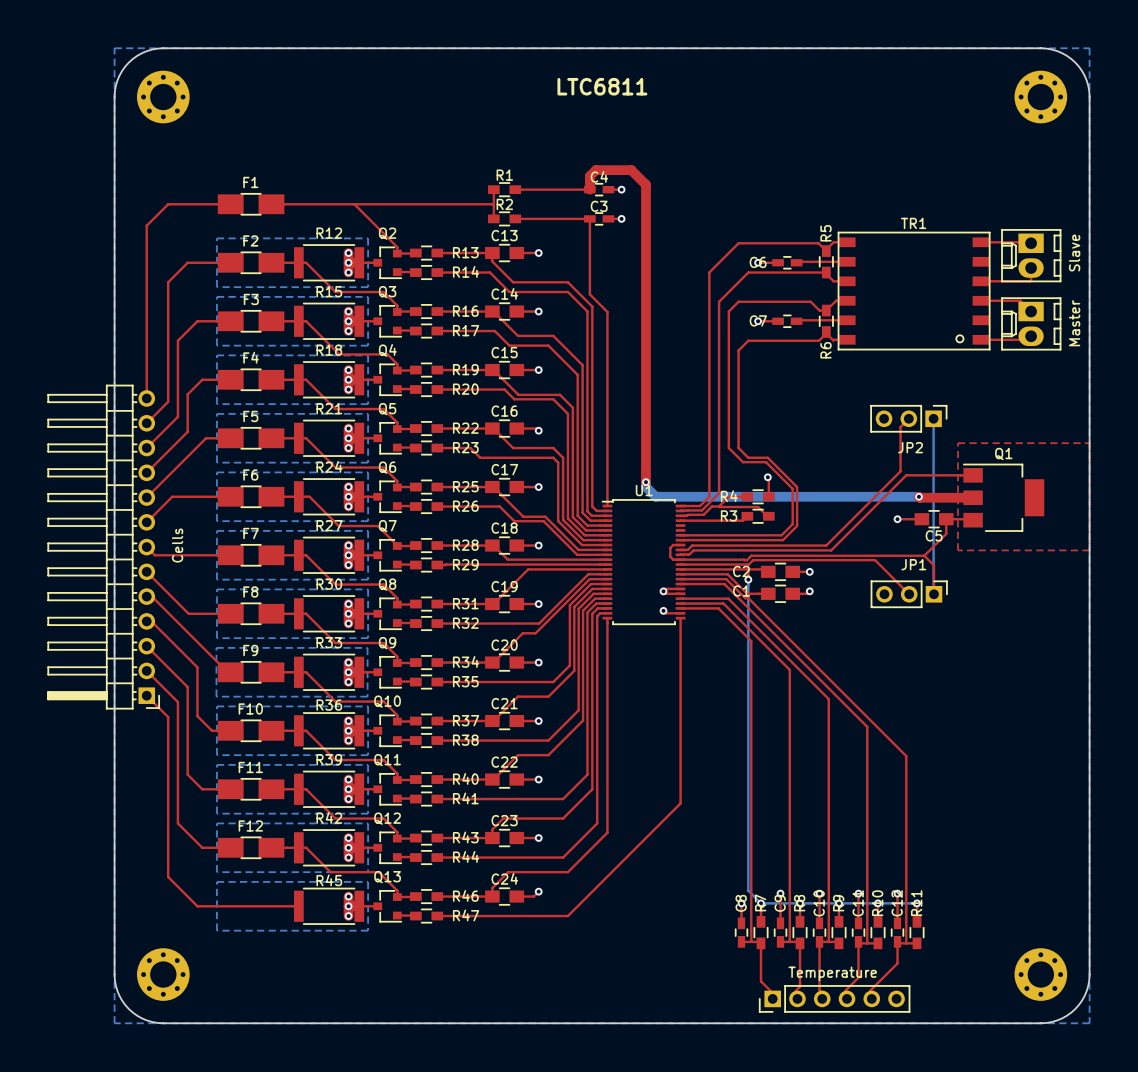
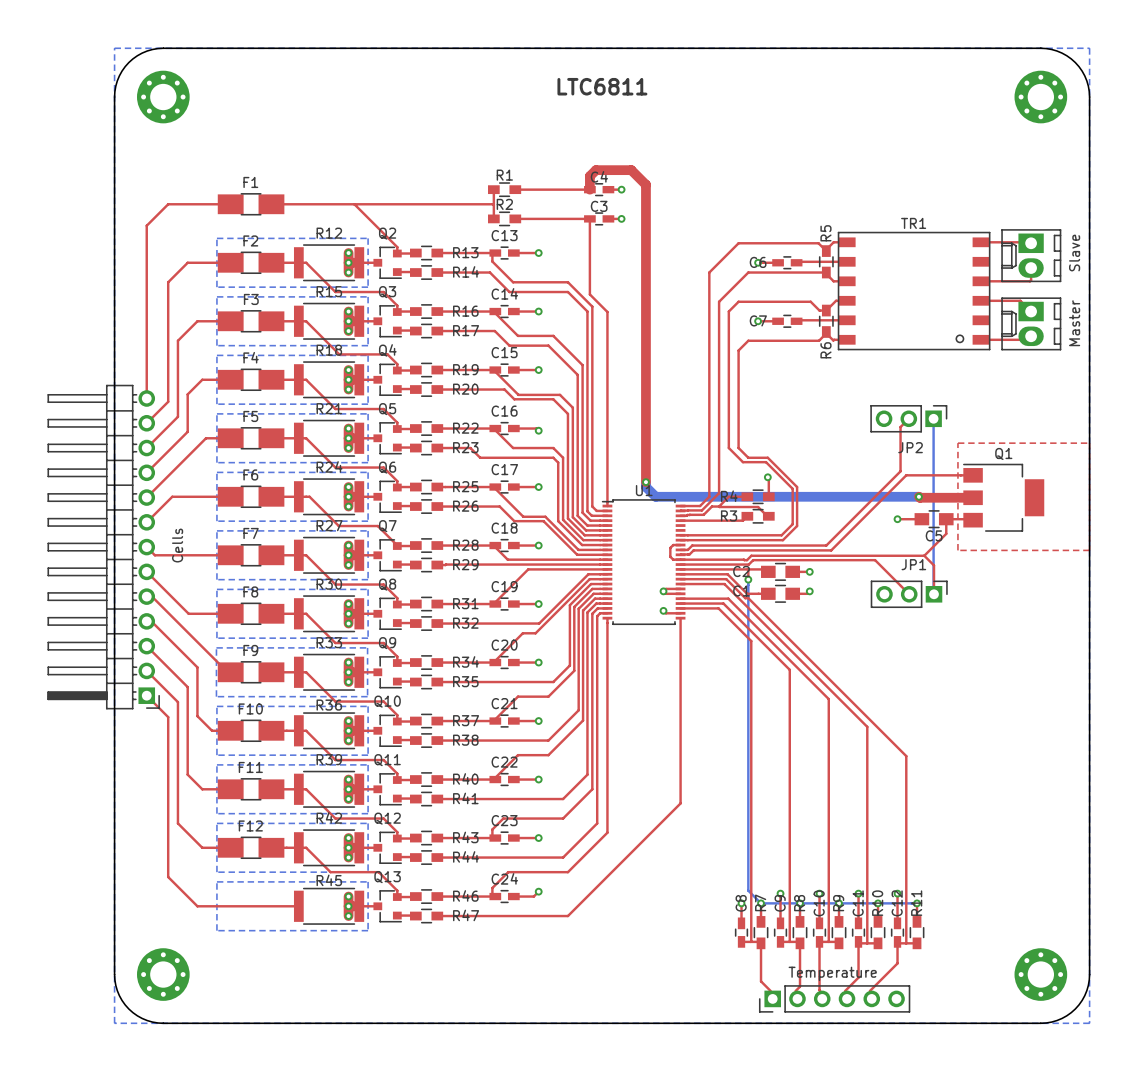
C13 footprint: [485, 244, 525, 262] -> [489, 246, 520, 260]
C14 footprint: [485, 302, 525, 321] -> [489, 305, 520, 318]
C15 footprint: [485, 361, 525, 379] -> [489, 363, 520, 377]
C16 footprint: [485, 419, 525, 438] -> [489, 422, 520, 435]
C17 footprint: [485, 478, 525, 496] -> [489, 480, 520, 494]
C18 footprint: [485, 536, 525, 555] -> [489, 539, 520, 552]
C19 footprint: [485, 595, 525, 613] -> [489, 597, 520, 611]
C20 footprint: [485, 653, 525, 672] -> [489, 656, 520, 669]
C21 footprint: [485, 712, 525, 730] -> [489, 714, 520, 728]
C22 footprint: [485, 770, 525, 789] -> [489, 773, 520, 786]
C23 footprint: [485, 829, 525, 847] -> [489, 831, 520, 845]
C24 footprint: [485, 887, 525, 906] -> [489, 890, 520, 903]

